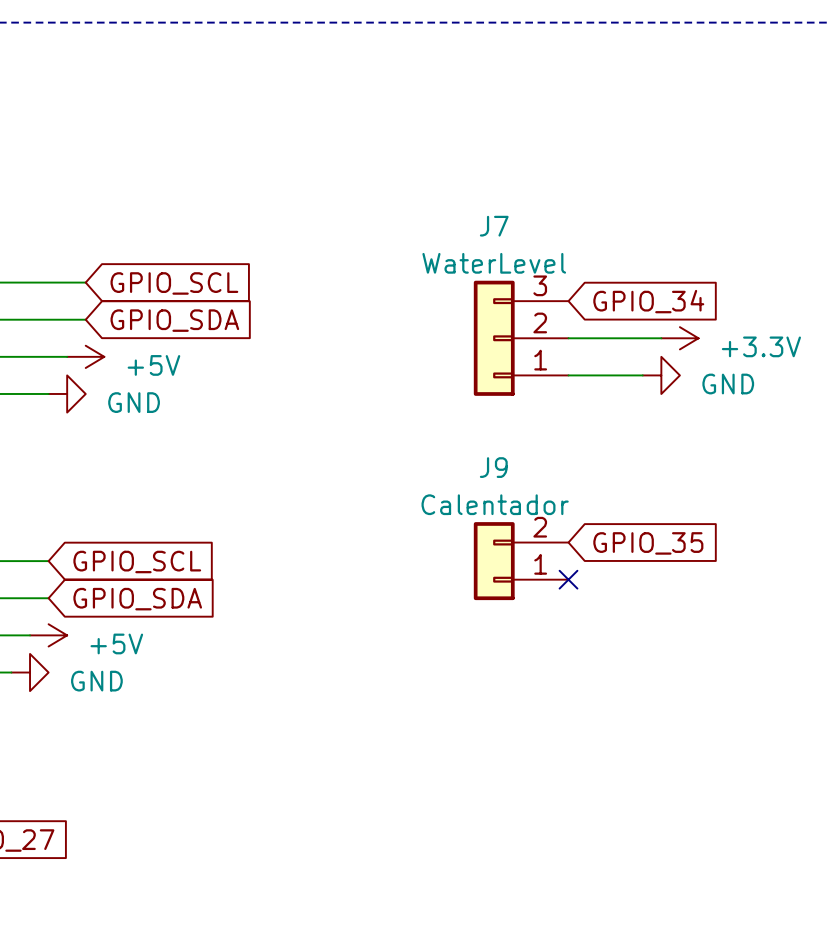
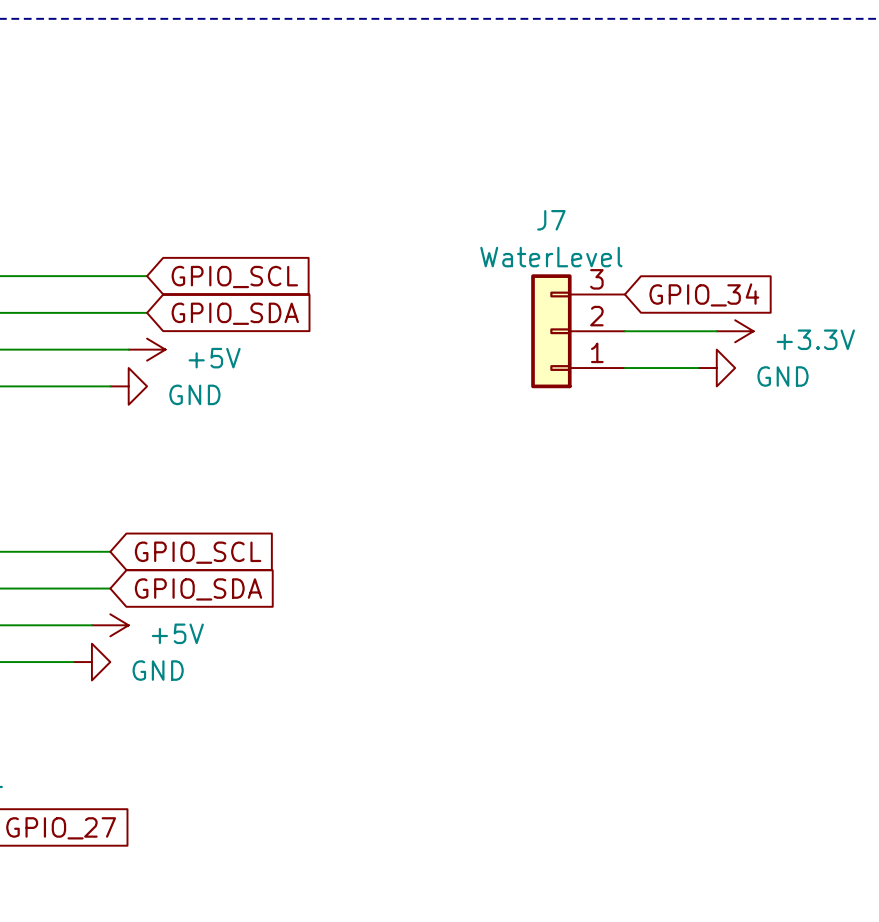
global label: GPIO_35 (648, 543) -> none
J9: Calentador (521, 561) -> none
no-connect mark: (568, 579) -> none

